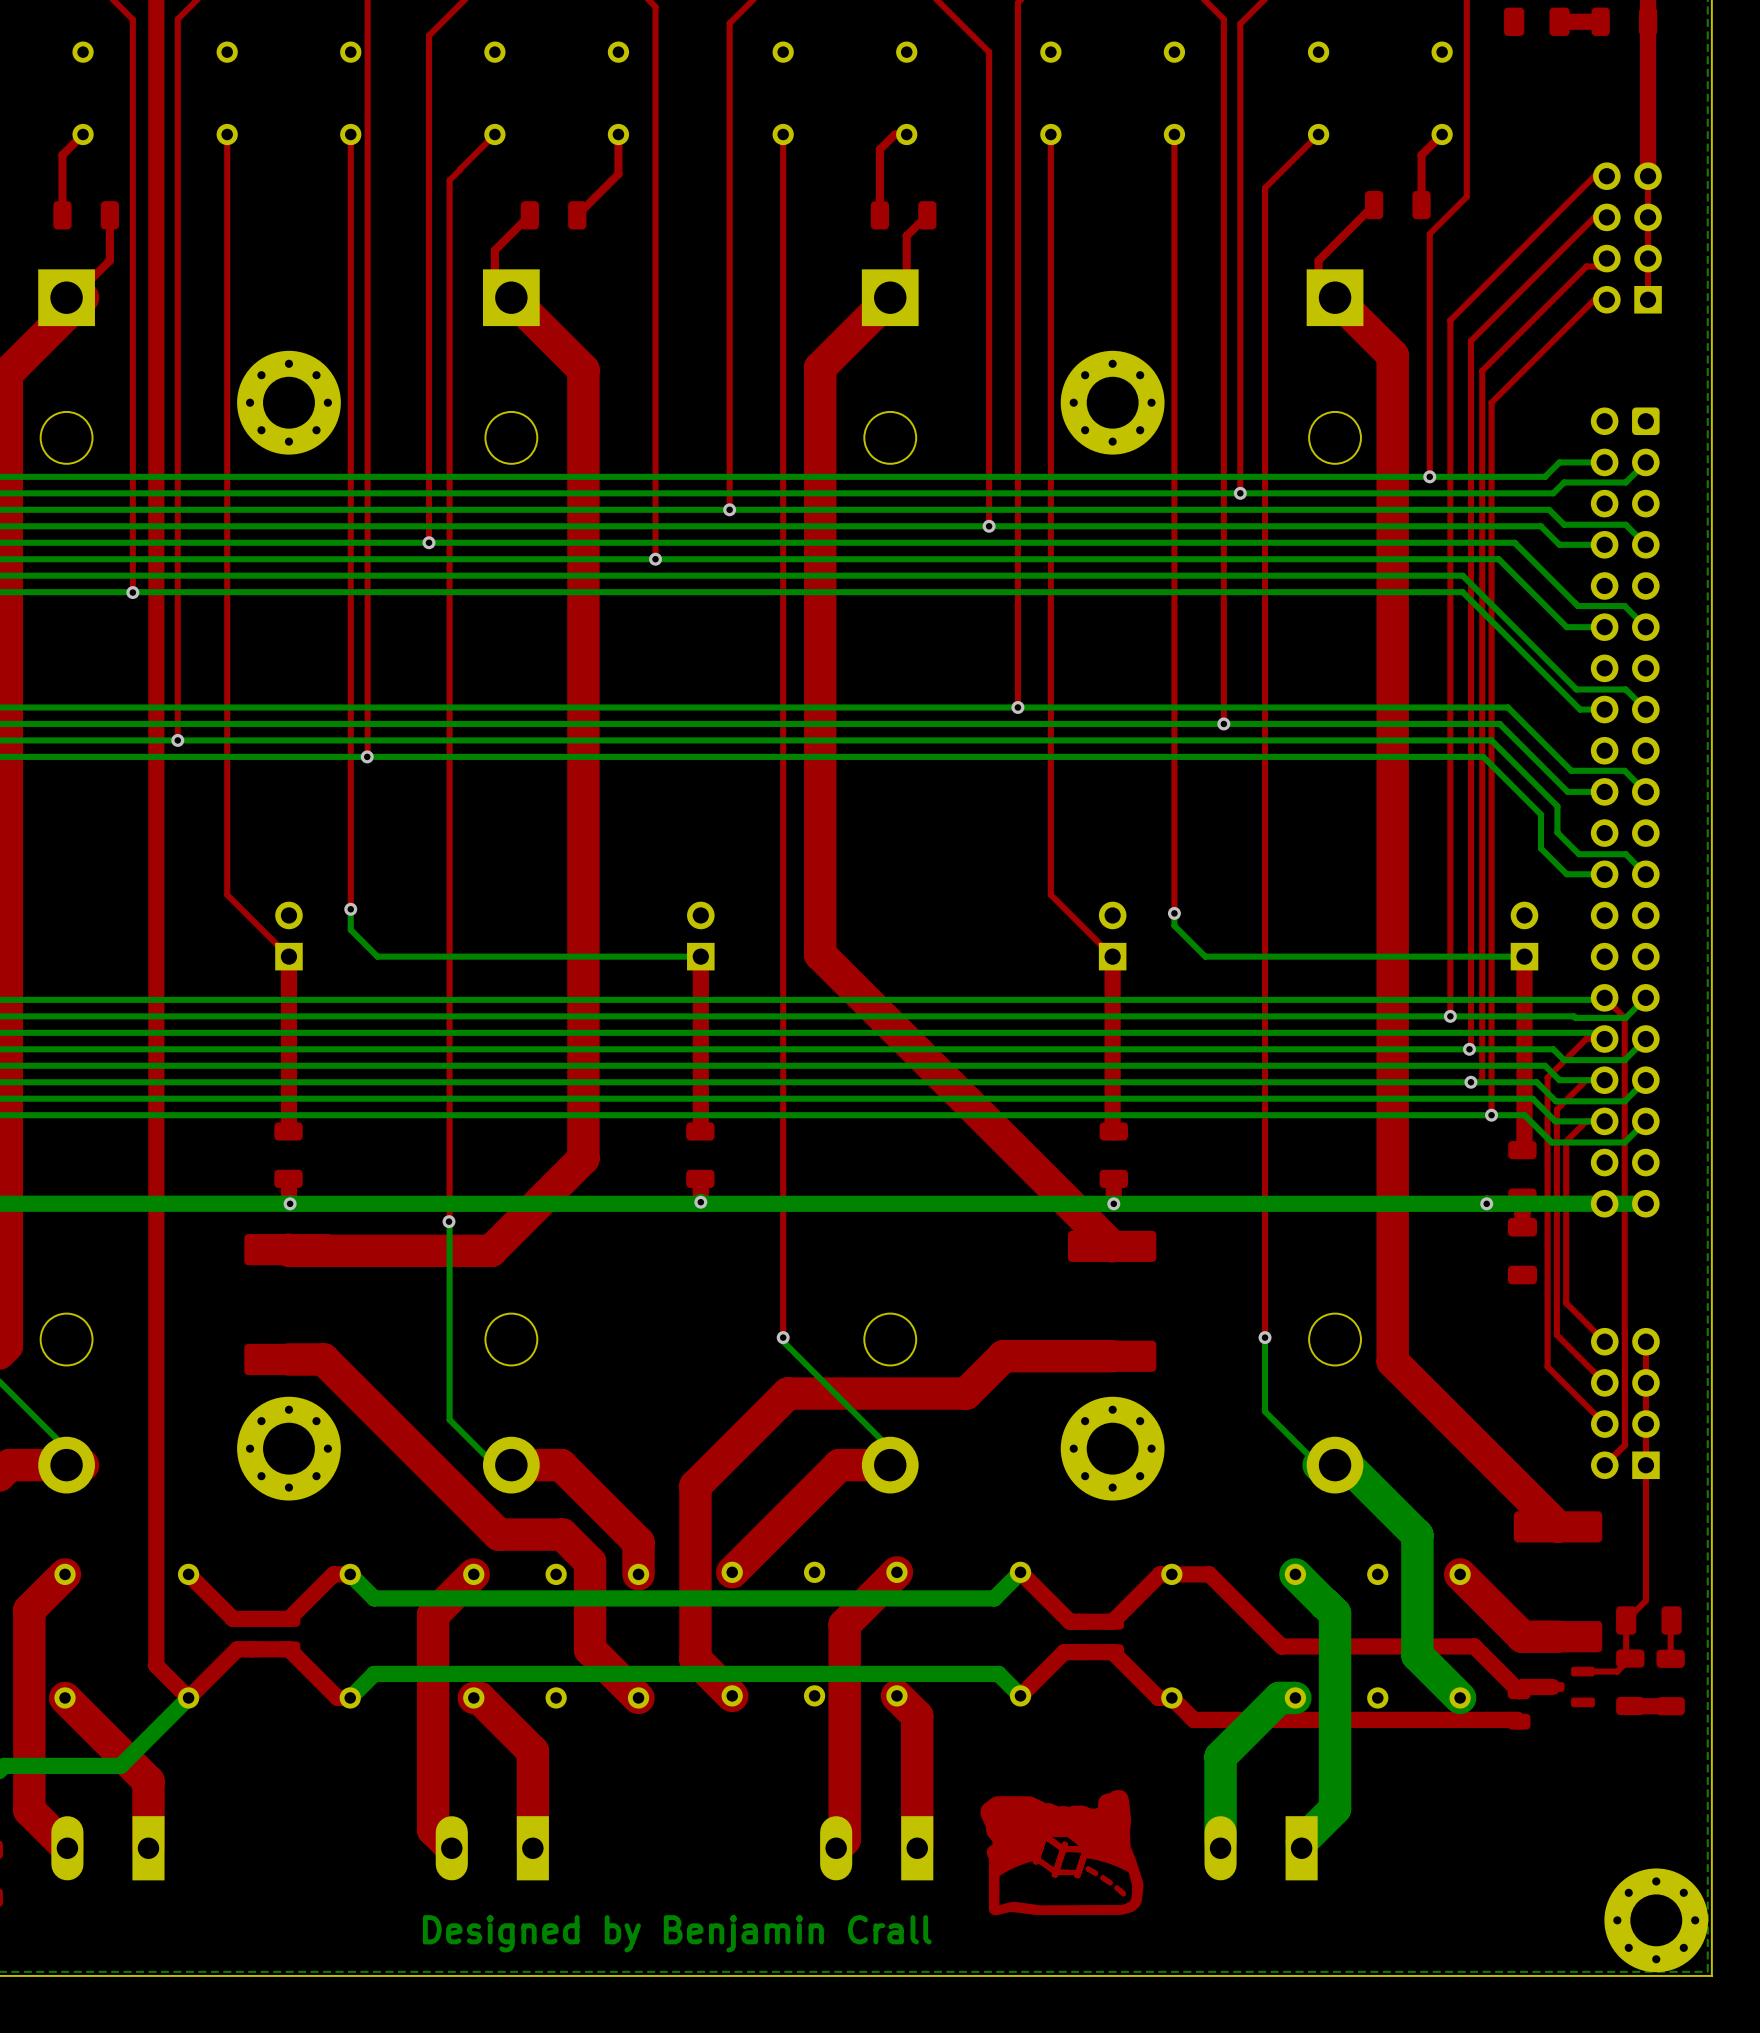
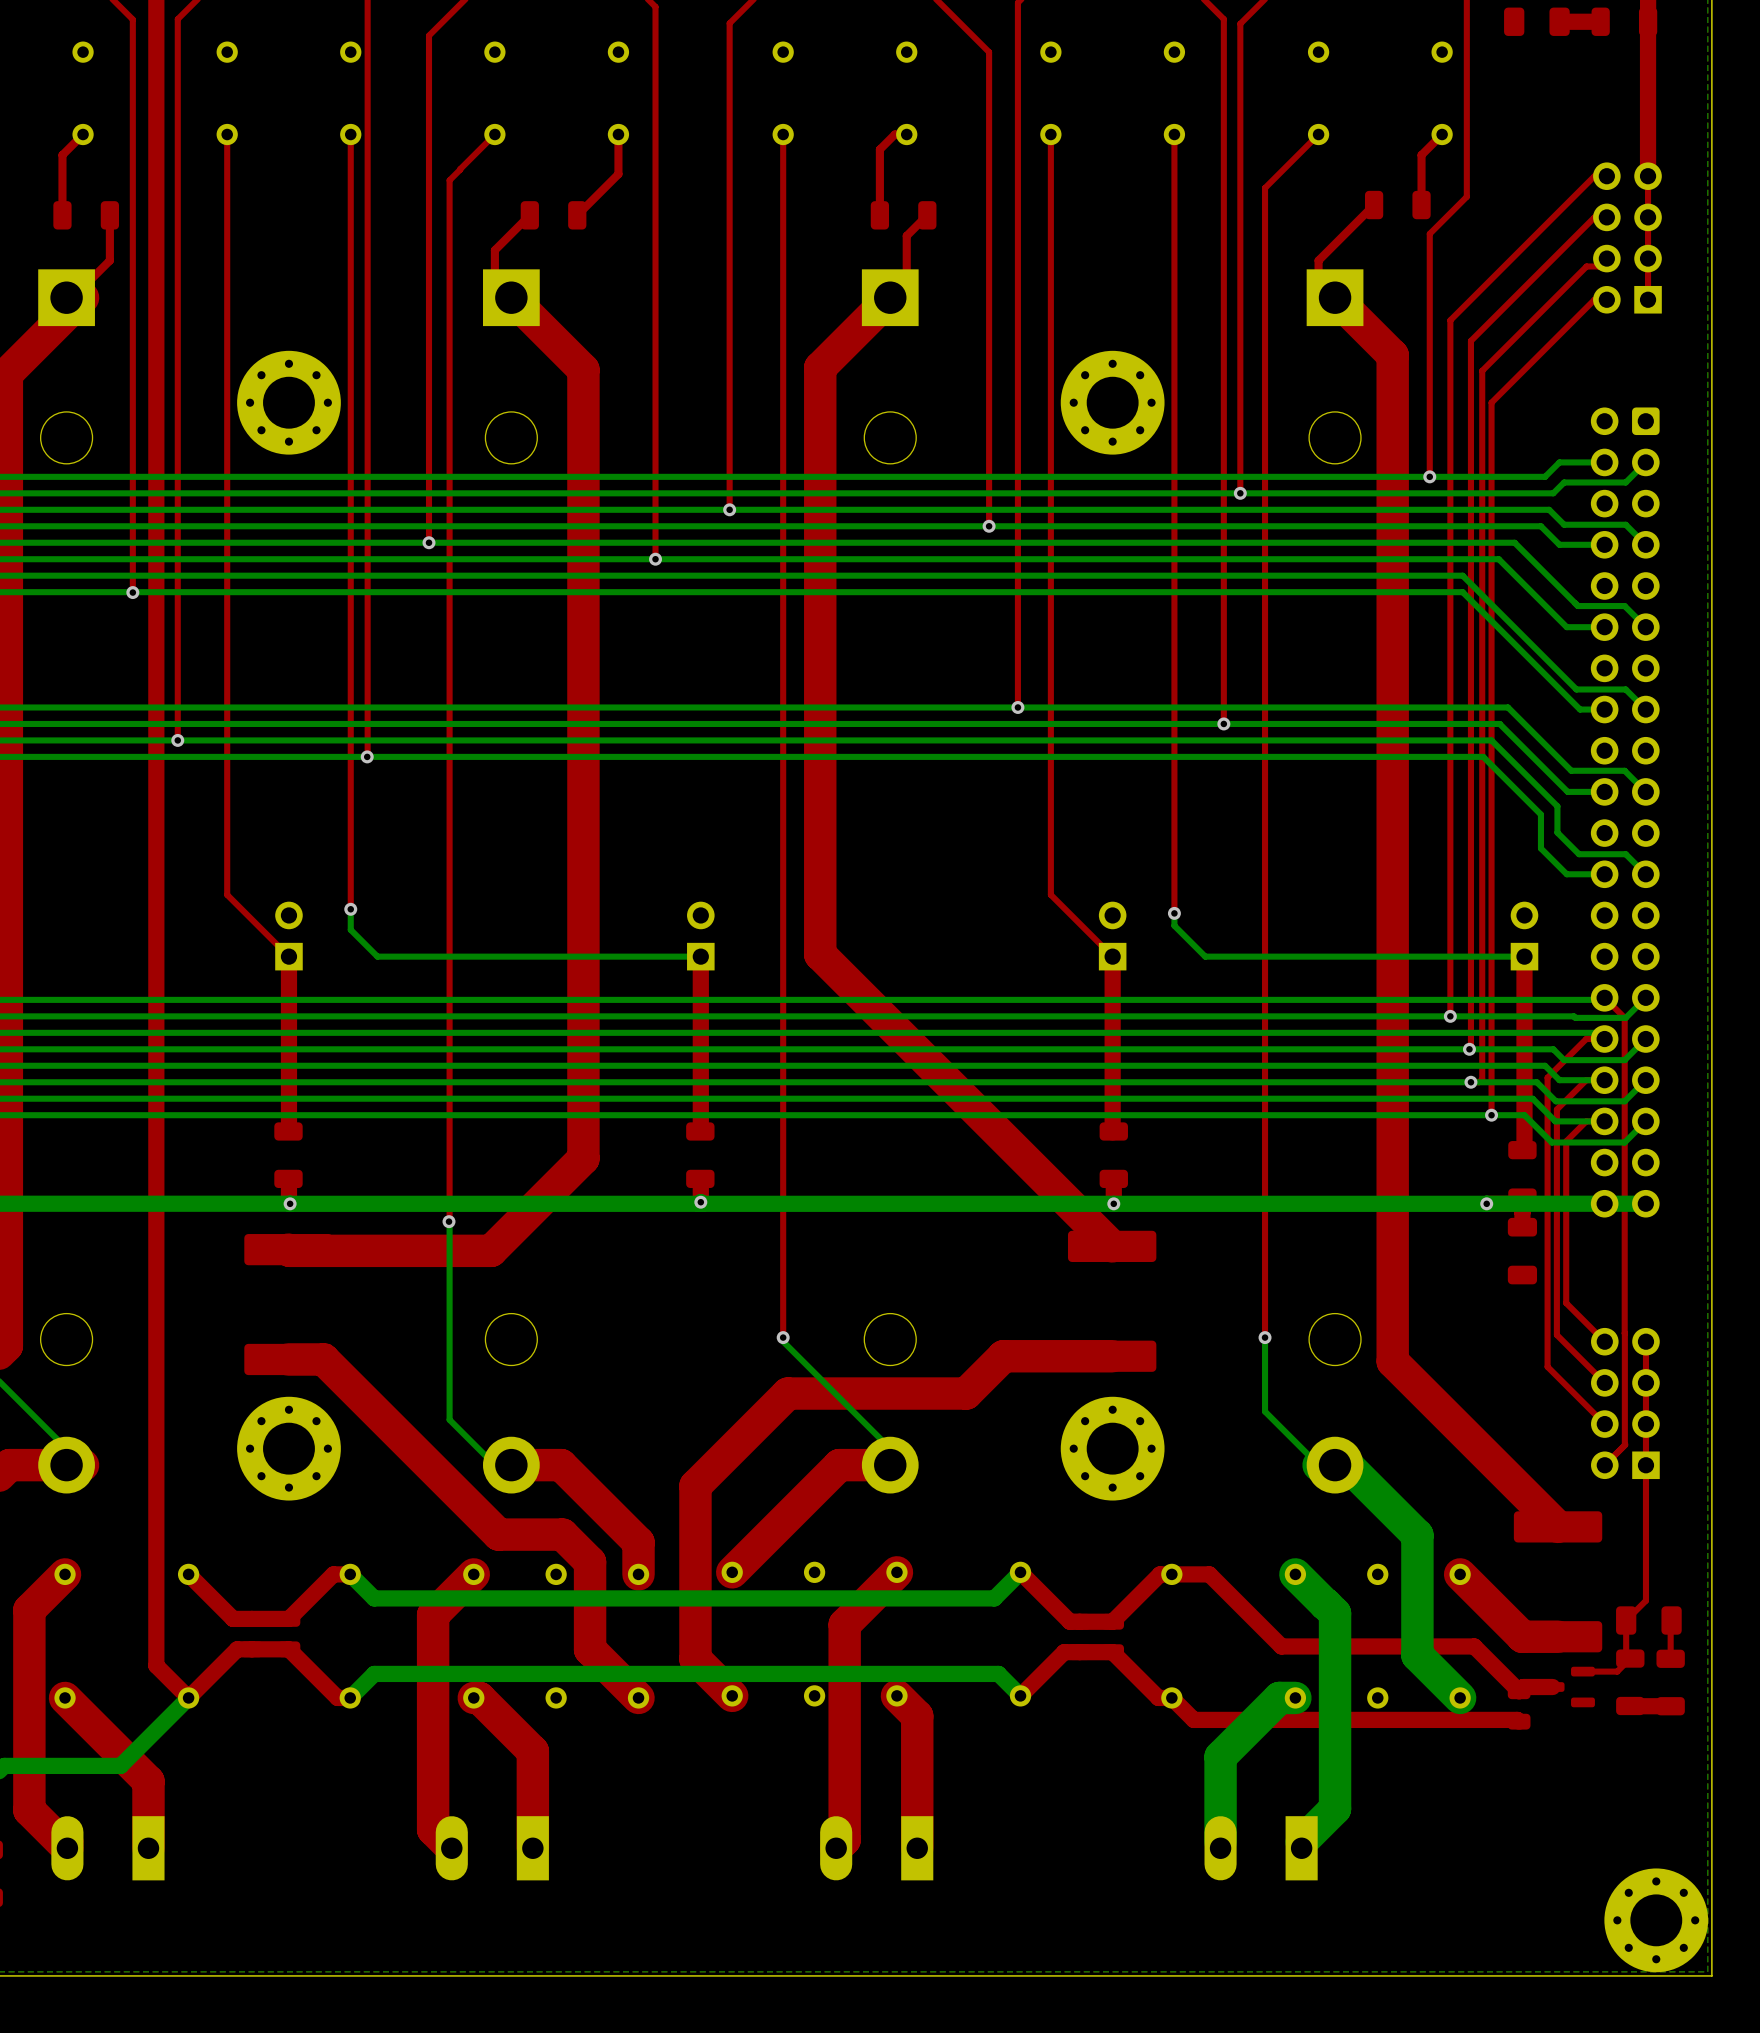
drawing: [980, 1790, 1144, 1916] -> none
text: Designed by Benjamin Crall (677, 1933) -> none

